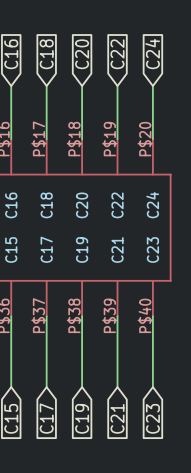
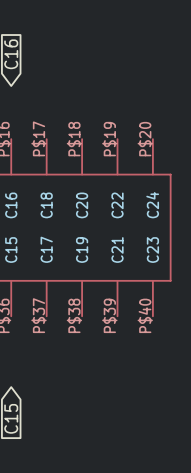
global label: C18 (46, 54) -> none
global label: C20 (82, 54) -> none
global label: C22 (117, 54) -> none
global label: C24 (152, 54) -> none
wire: (11, 86) (11, 139) -> none
wire: (46, 86) (46, 139) -> none
wire: (82, 86) (82, 139) -> none
wire: (117, 86) (117, 139) -> none
wire: (152, 86) (152, 139) -> none
wire: (11, 316) (11, 387) -> none
wire: (46, 316) (46, 387) -> none
wire: (82, 316) (82, 387) -> none
wire: (117, 316) (117, 387) -> none
wire: (152, 316) (152, 387) -> none
global label: C17 (46, 418) -> none
global label: C19 (82, 418) -> none
global label: C21 (117, 418) -> none
global label: C23 (152, 418) -> none

